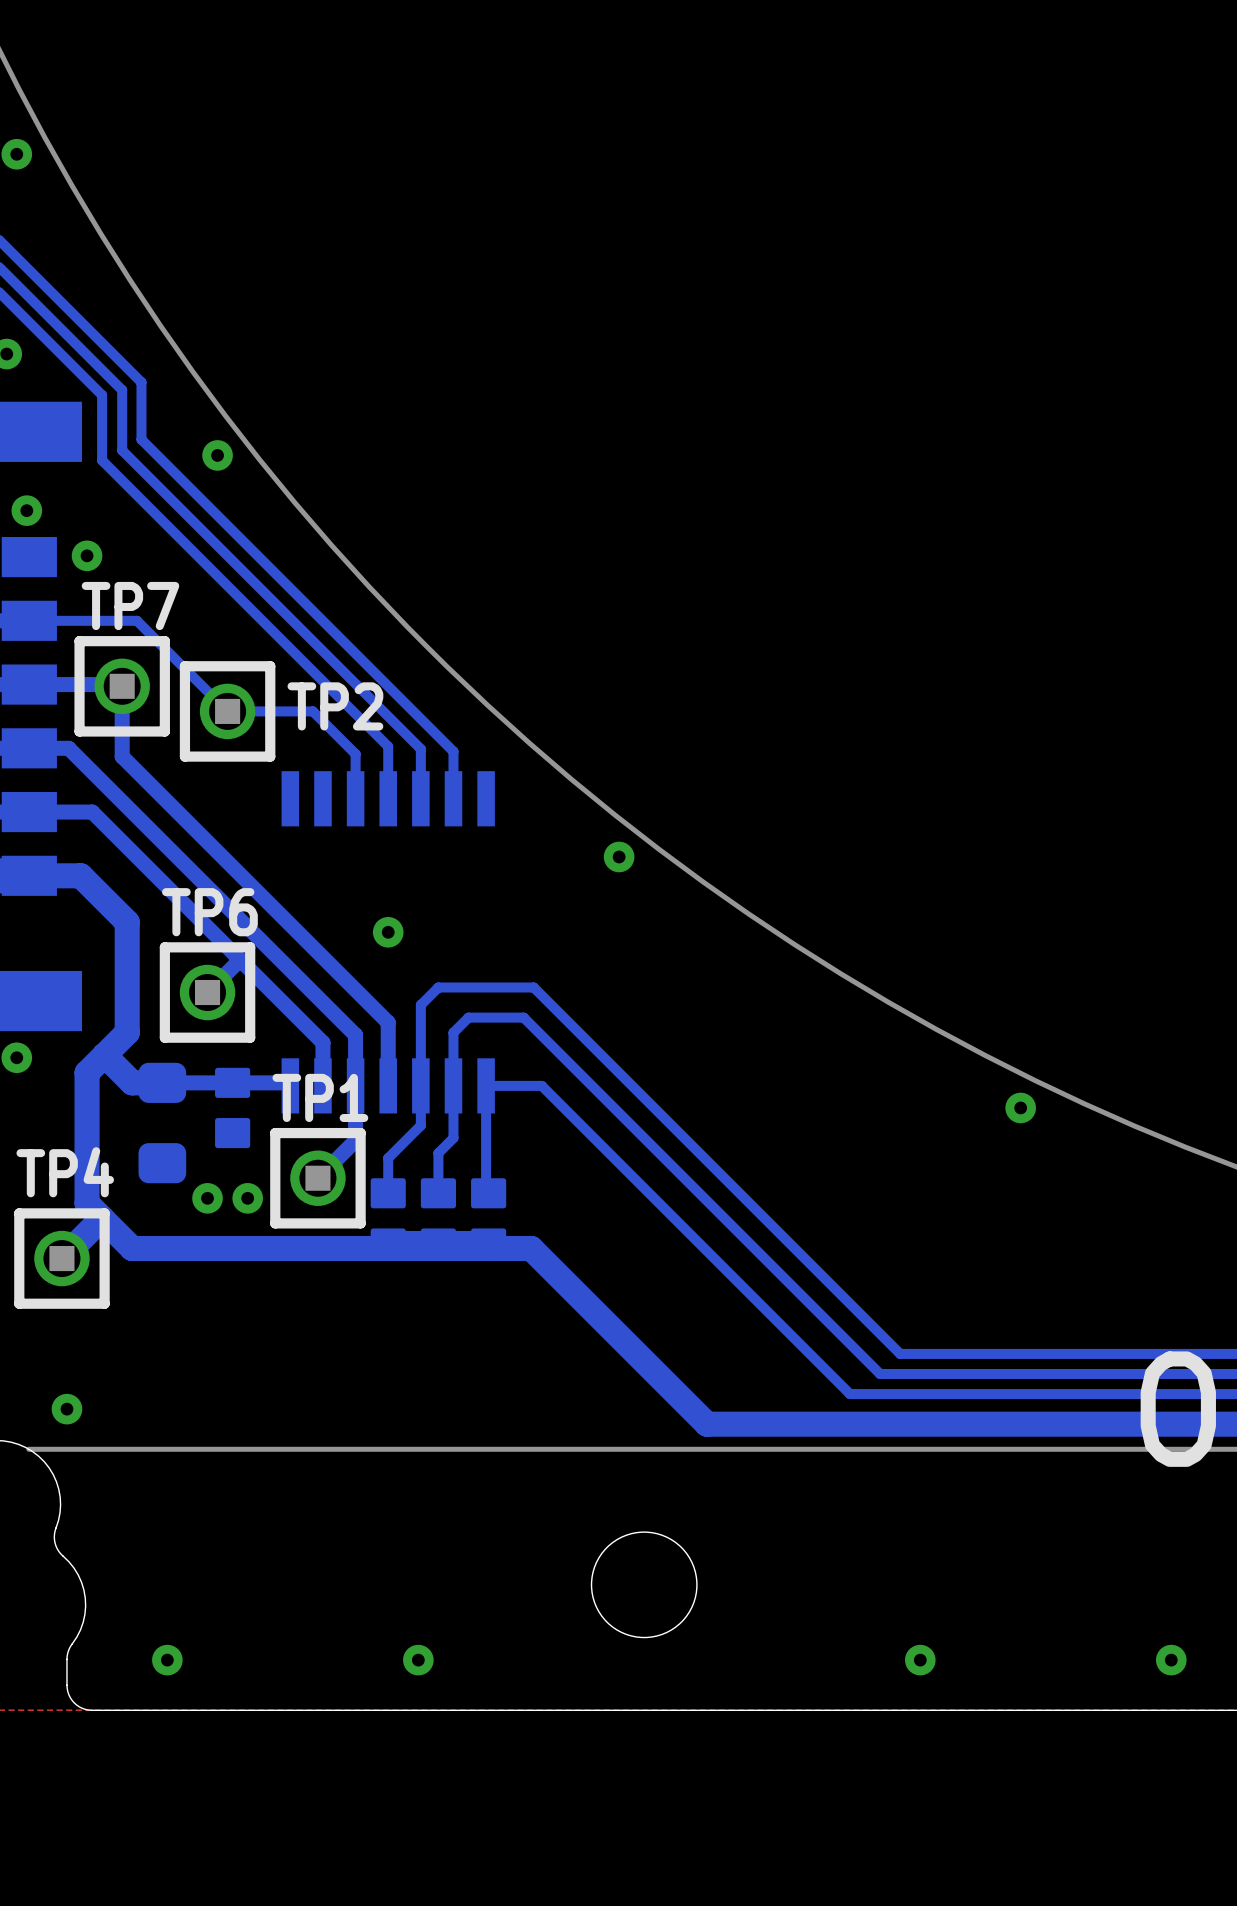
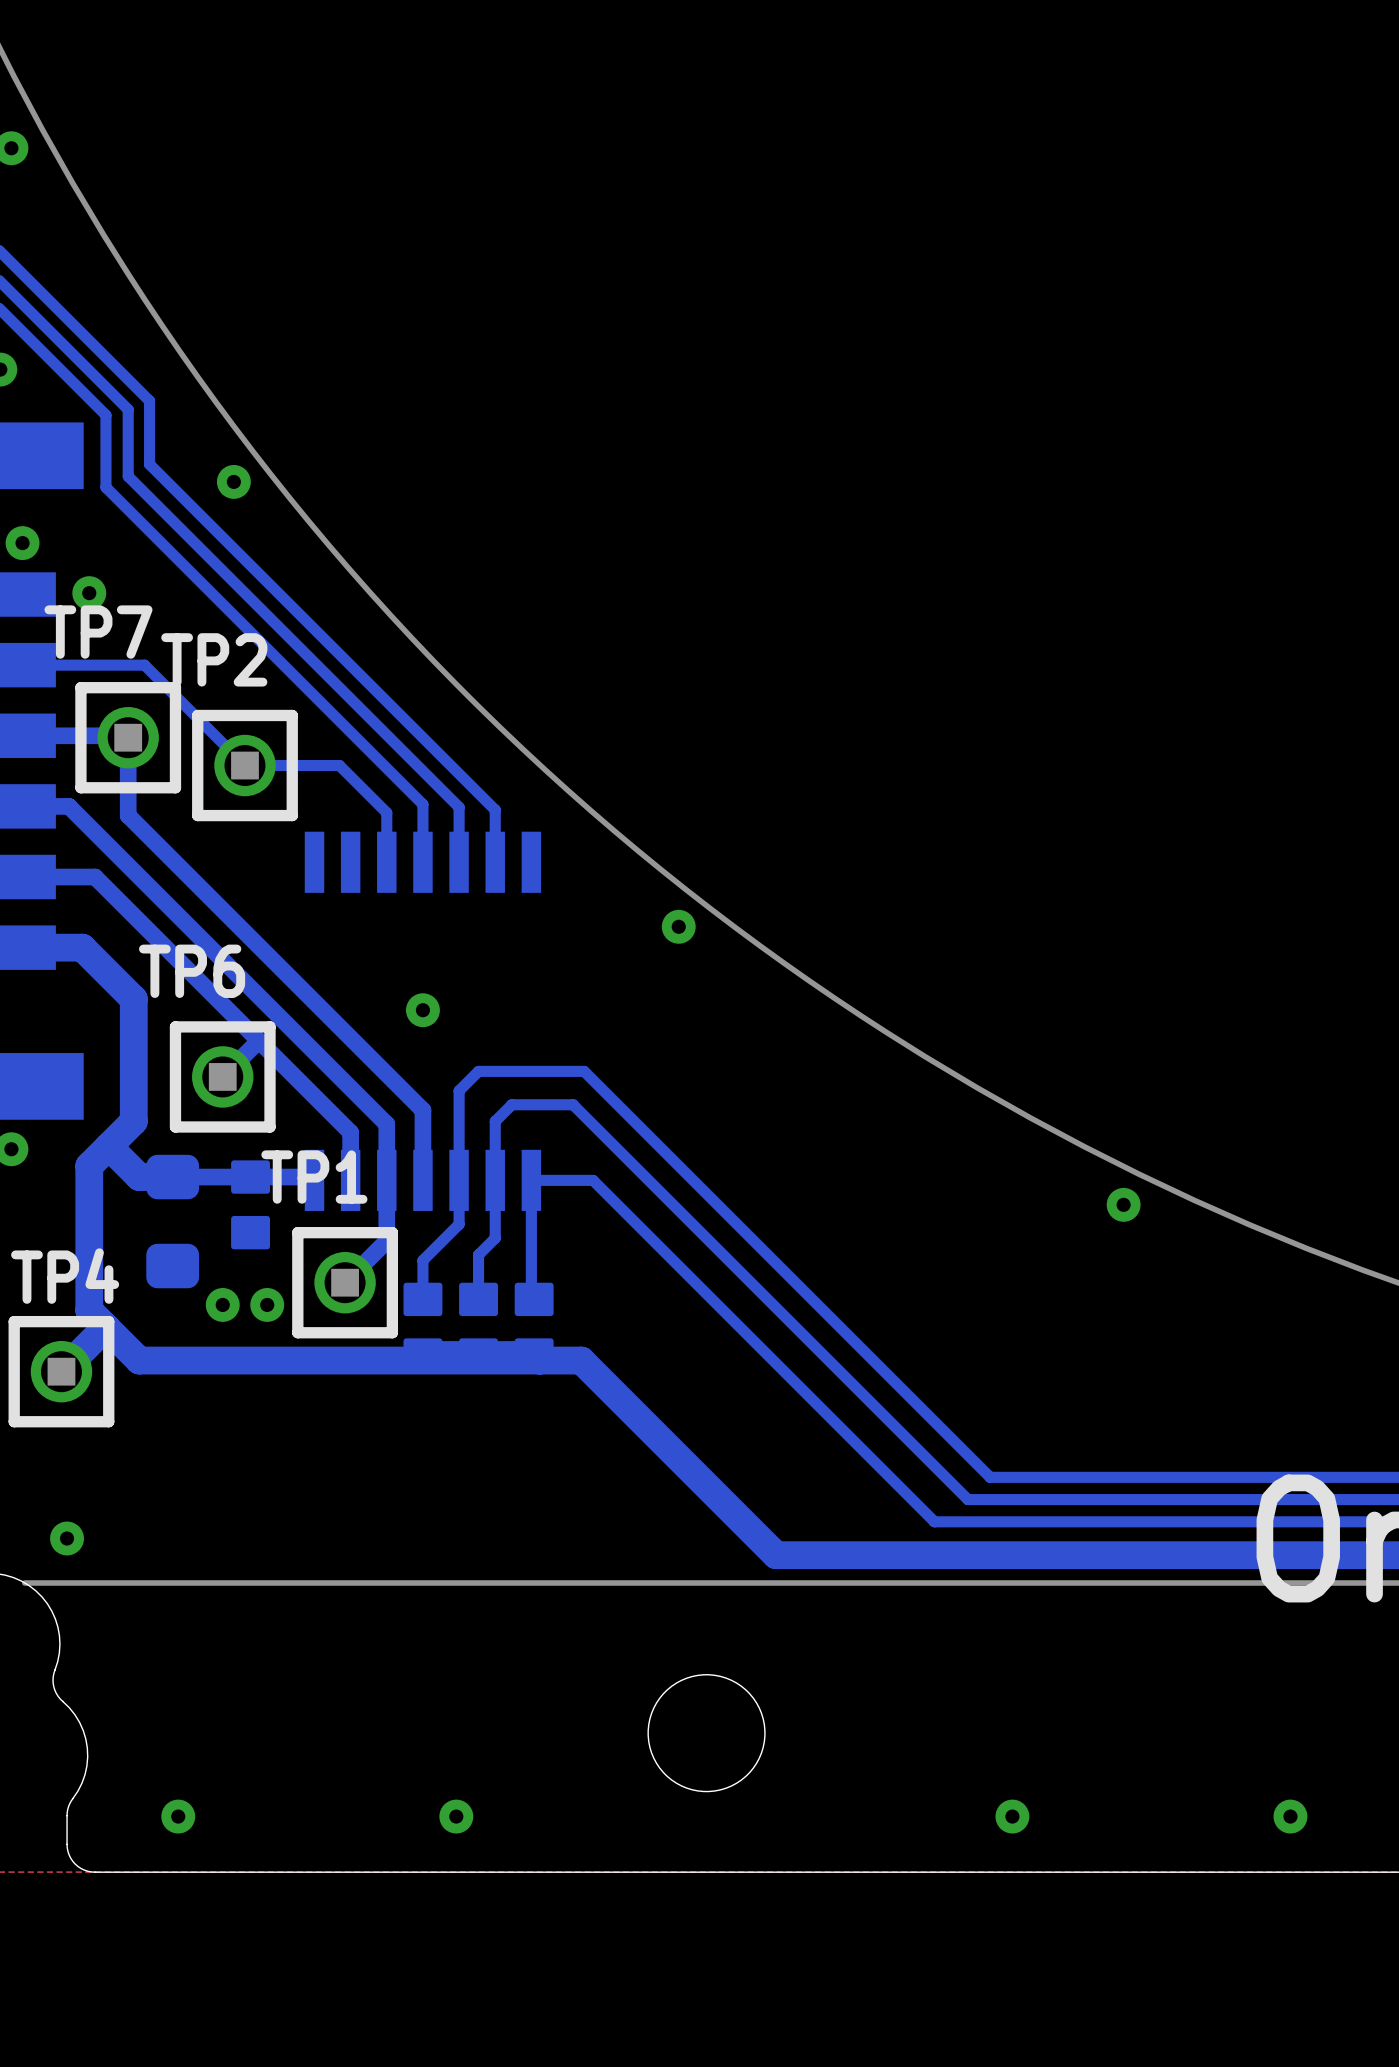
TP7 name position: TP7 (130, 606) -> TP7 (98, 632)
TP2 name position: TP2 (335, 706) -> TP2 (214, 659)
TP6 name position: TP6 (209, 912) -> TP6 (192, 971)
TP1 name position: TP1 (320, 1097) -> TP1 (314, 1177)

